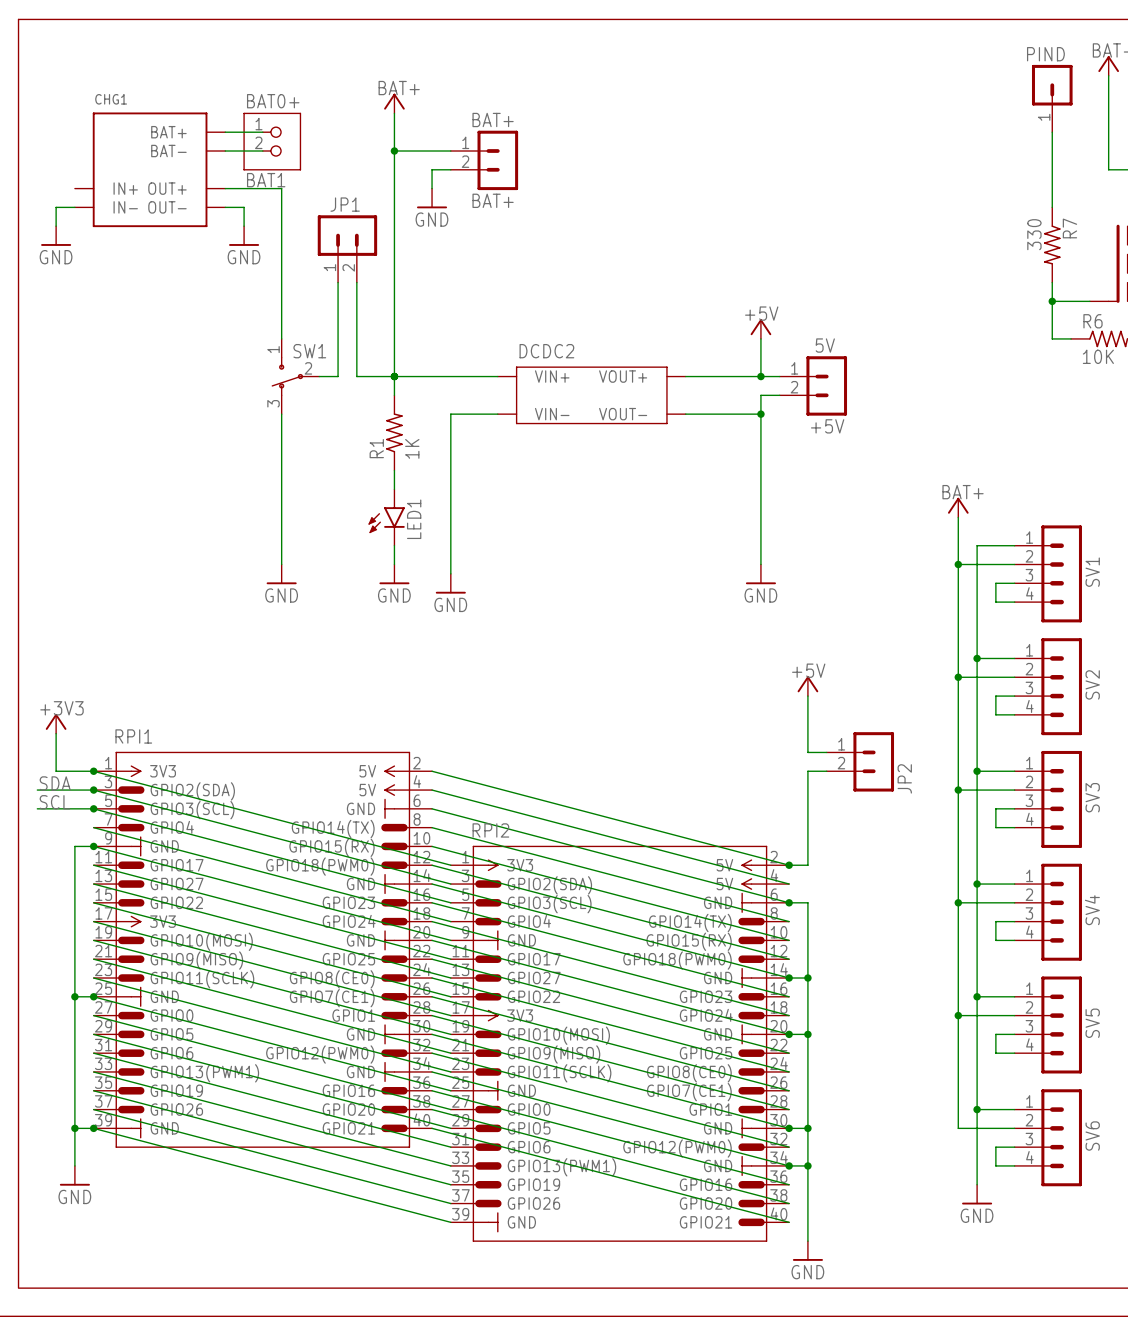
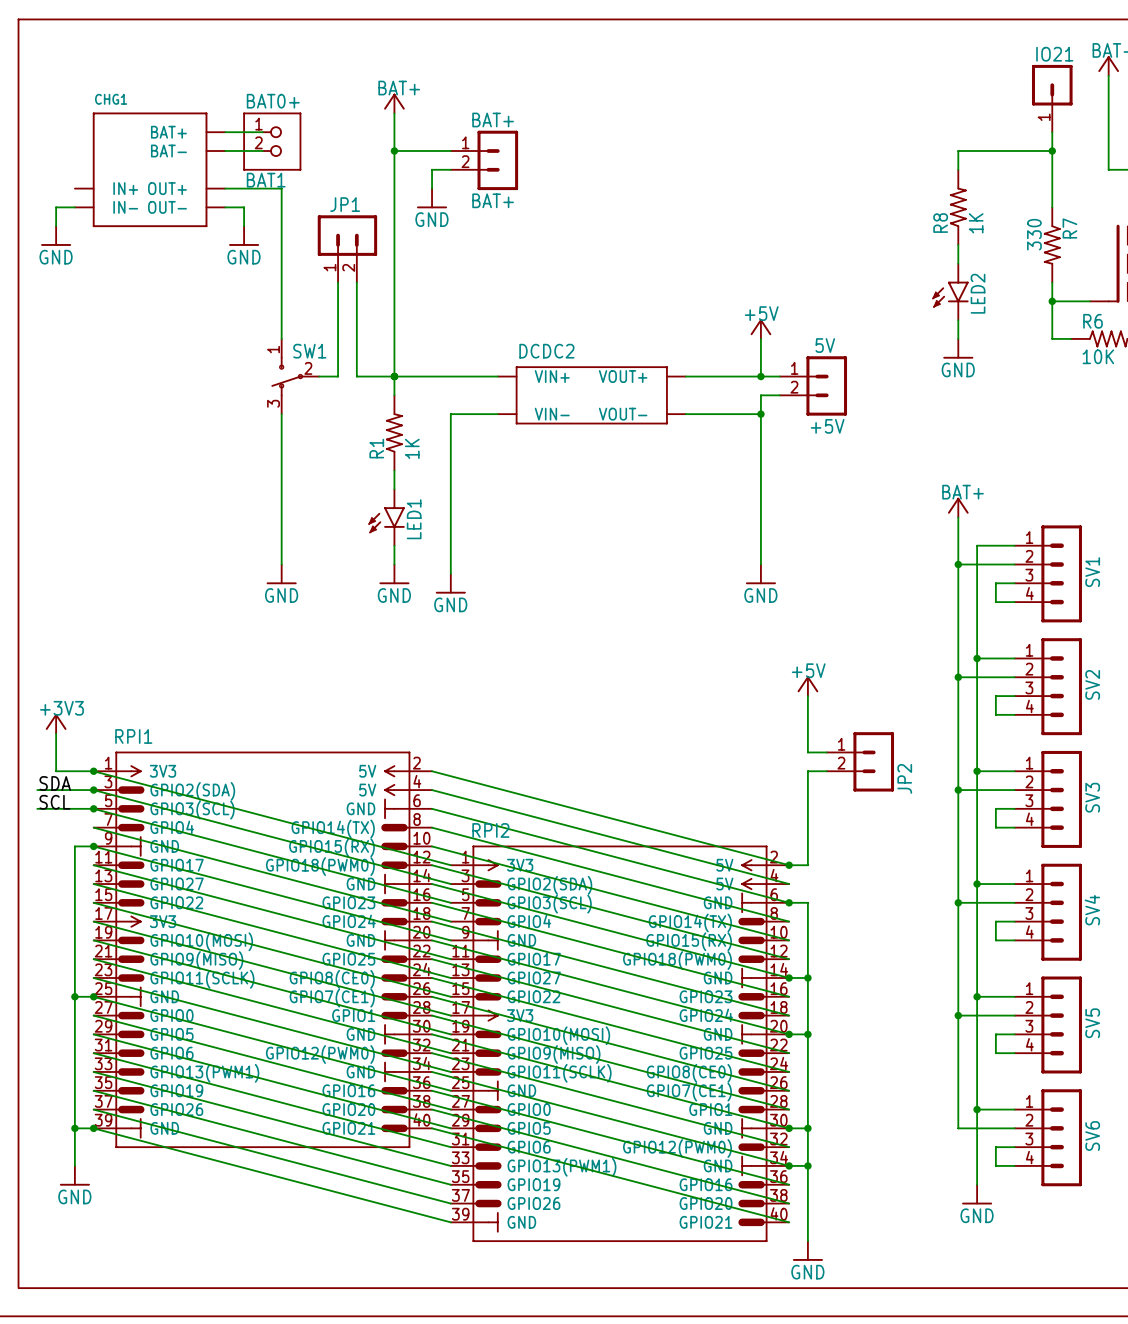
PIND name: PIND (1045, 54) -> IO21 (1054, 54)
wire: none -> (1052, 151) (958, 151) (958, 169)
junction: none -> (1052, 151)
R8: none -> 1K (958, 207)
wire: none -> (958, 244) (958, 263)
LED2: none -> (950, 291)
wire: none -> (958, 320) (958, 338)
power symbol: none -> GND (958, 348)

